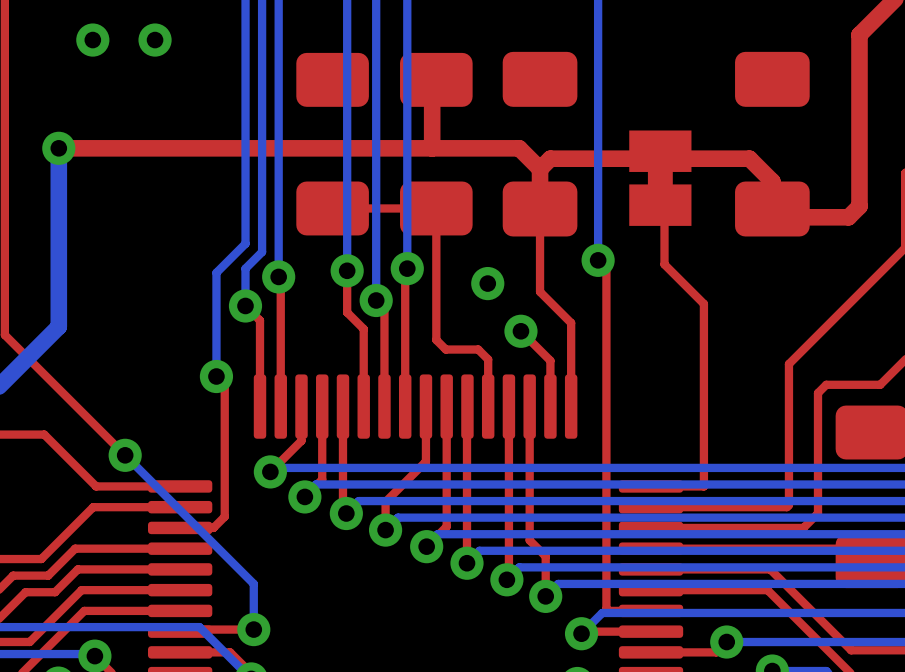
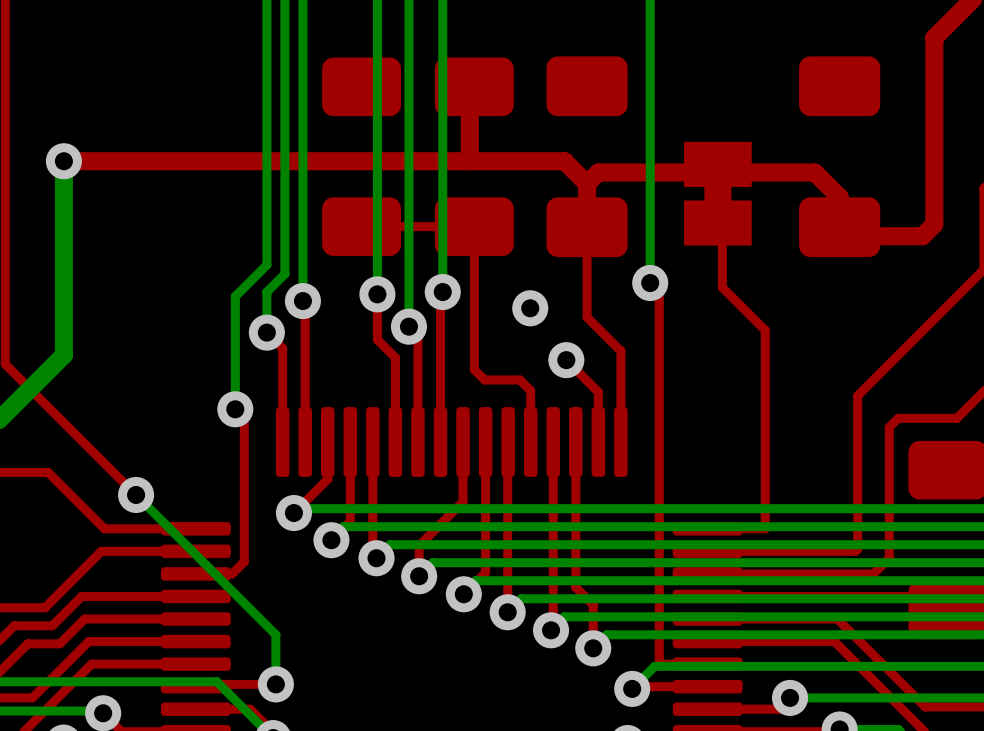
via: (92, 40) -> none
via: (155, 40) -> none

